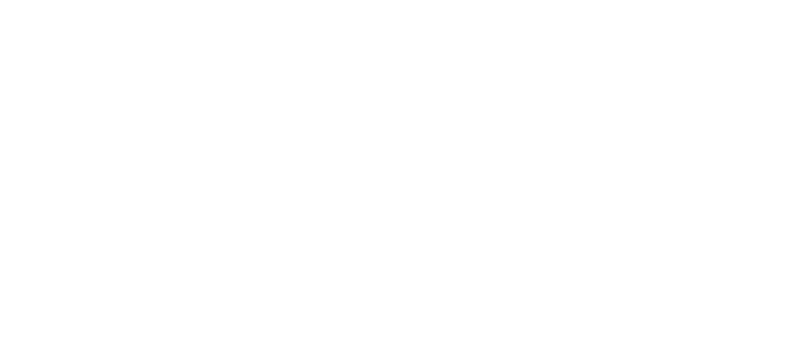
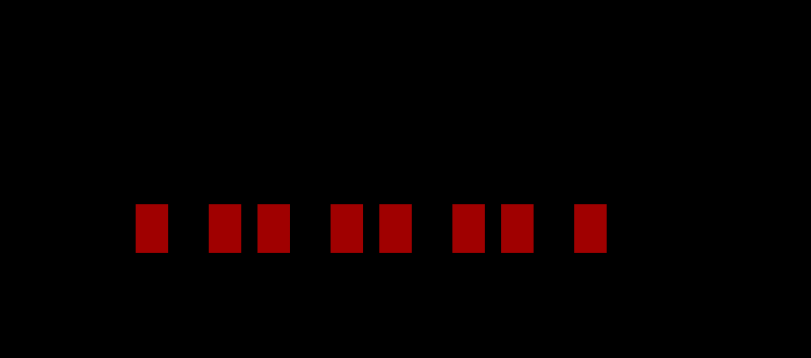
part: none -> (188, 228)
part: none -> (310, 228)
part: none -> (432, 228)
part: none -> (553, 228)

